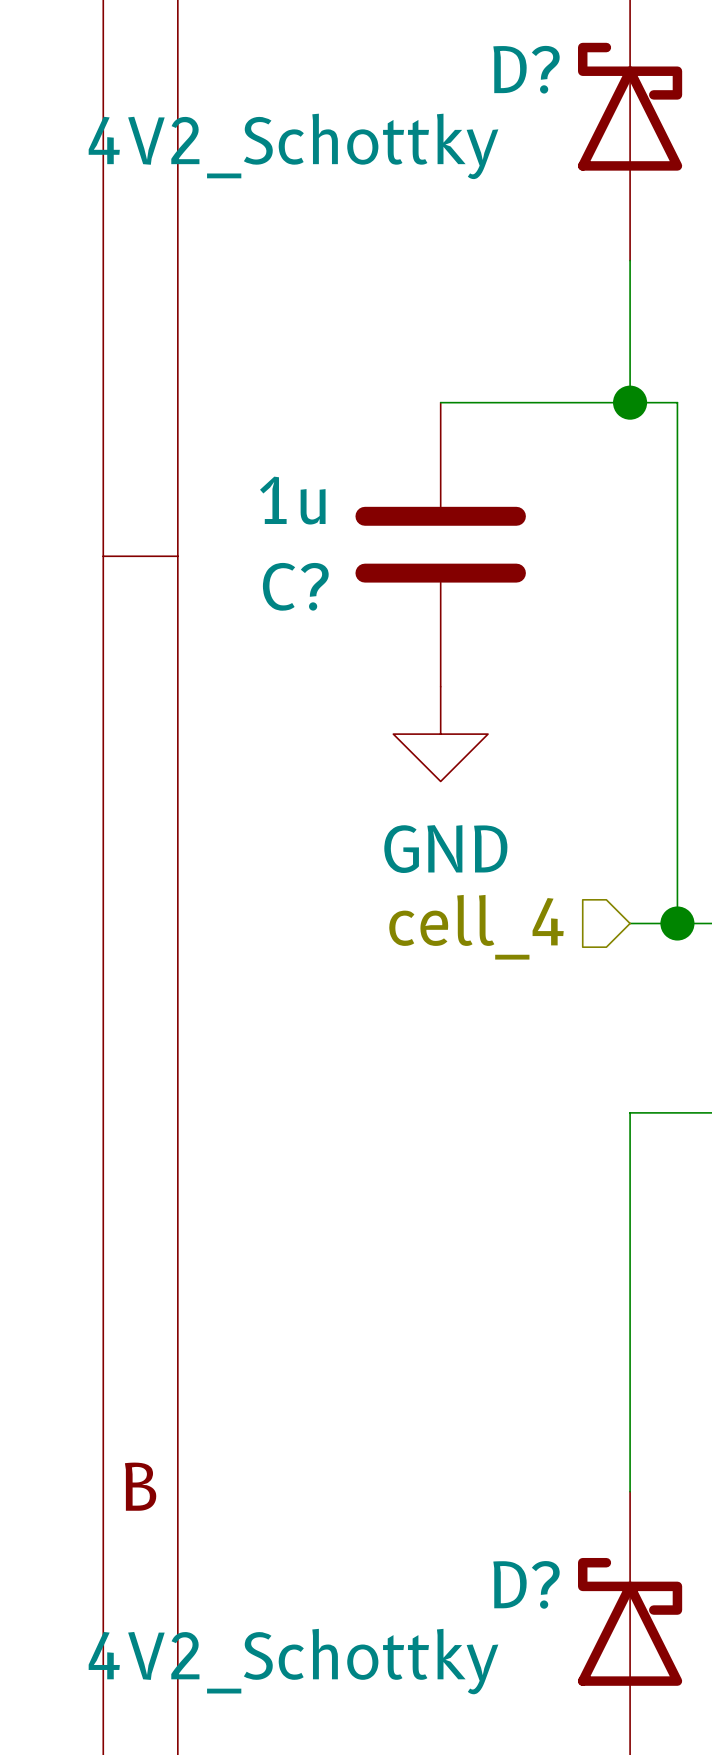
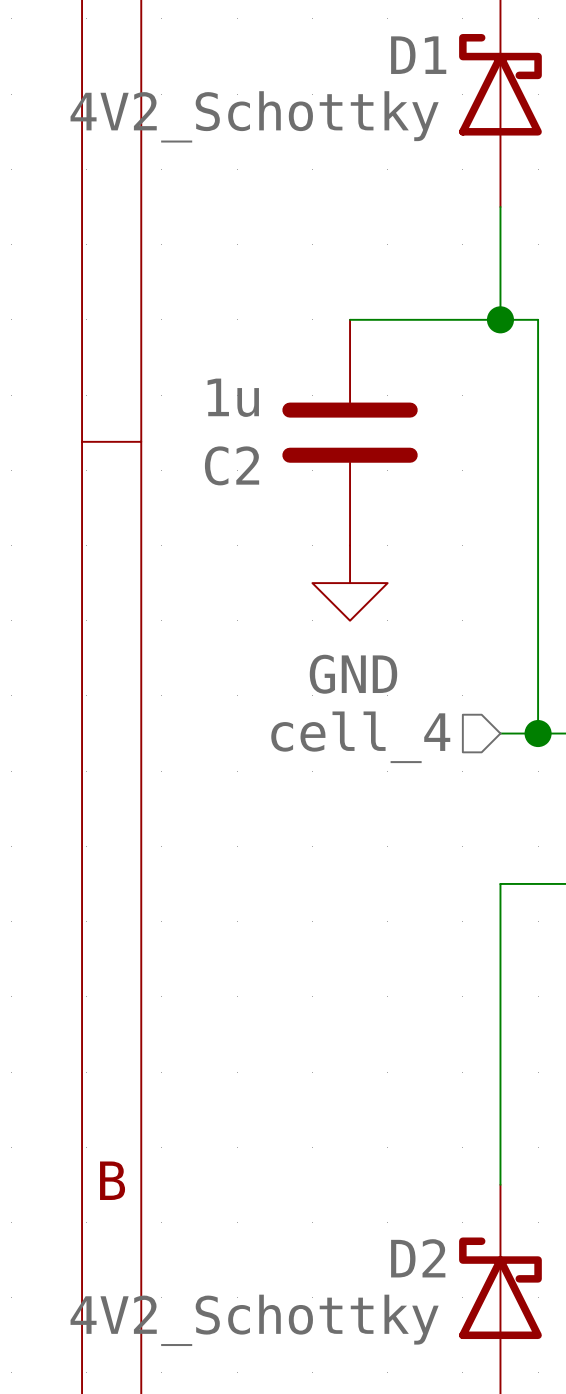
D? name: D? (526, 69) -> D1 (418, 55)
C? name: C? (295, 586) -> C2 (232, 465)
D? name: D? (526, 1584) -> D2 (418, 1258)

